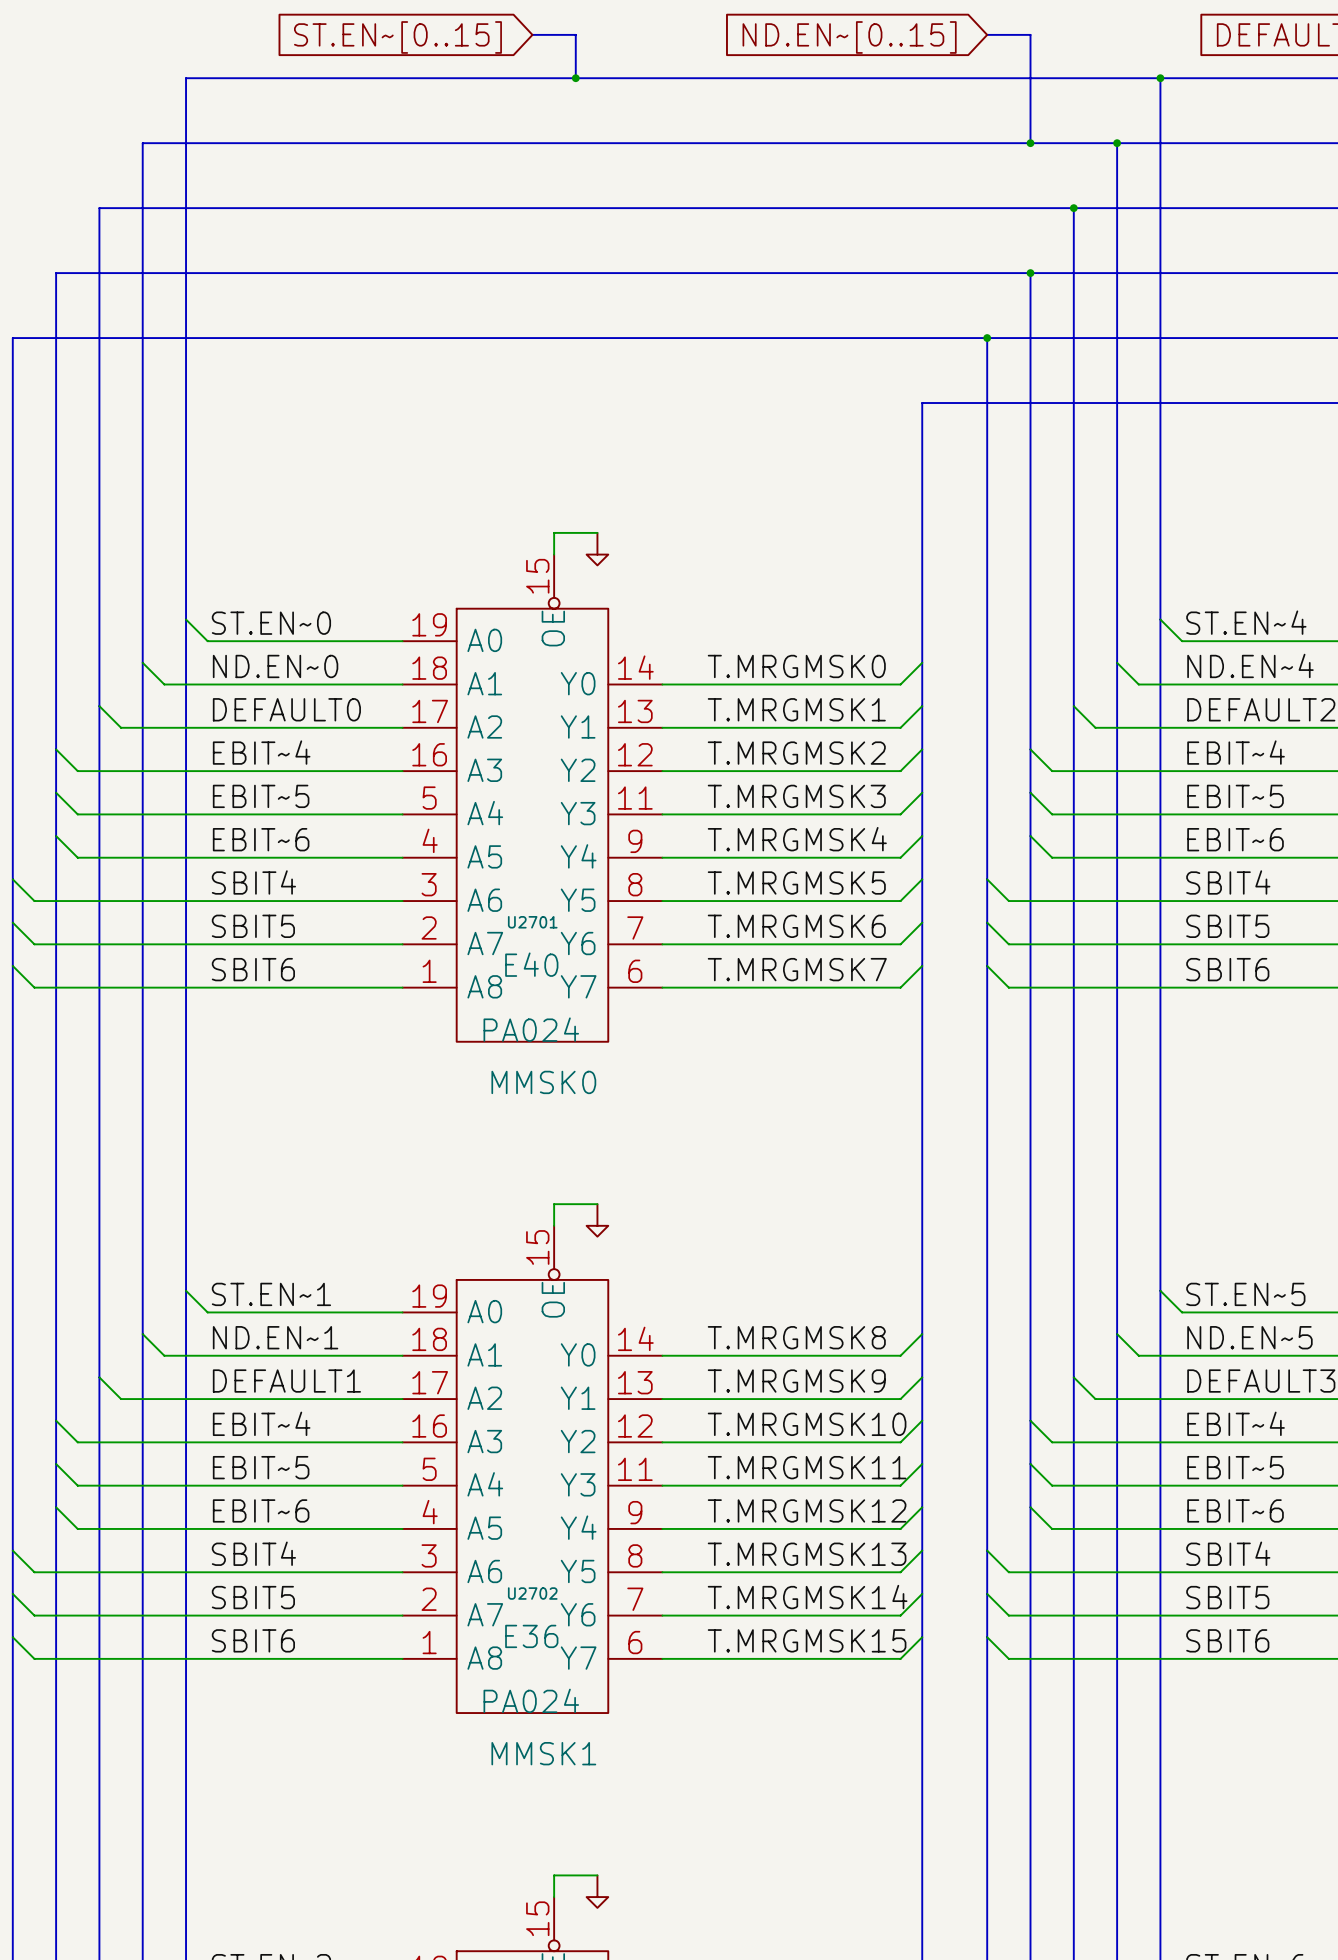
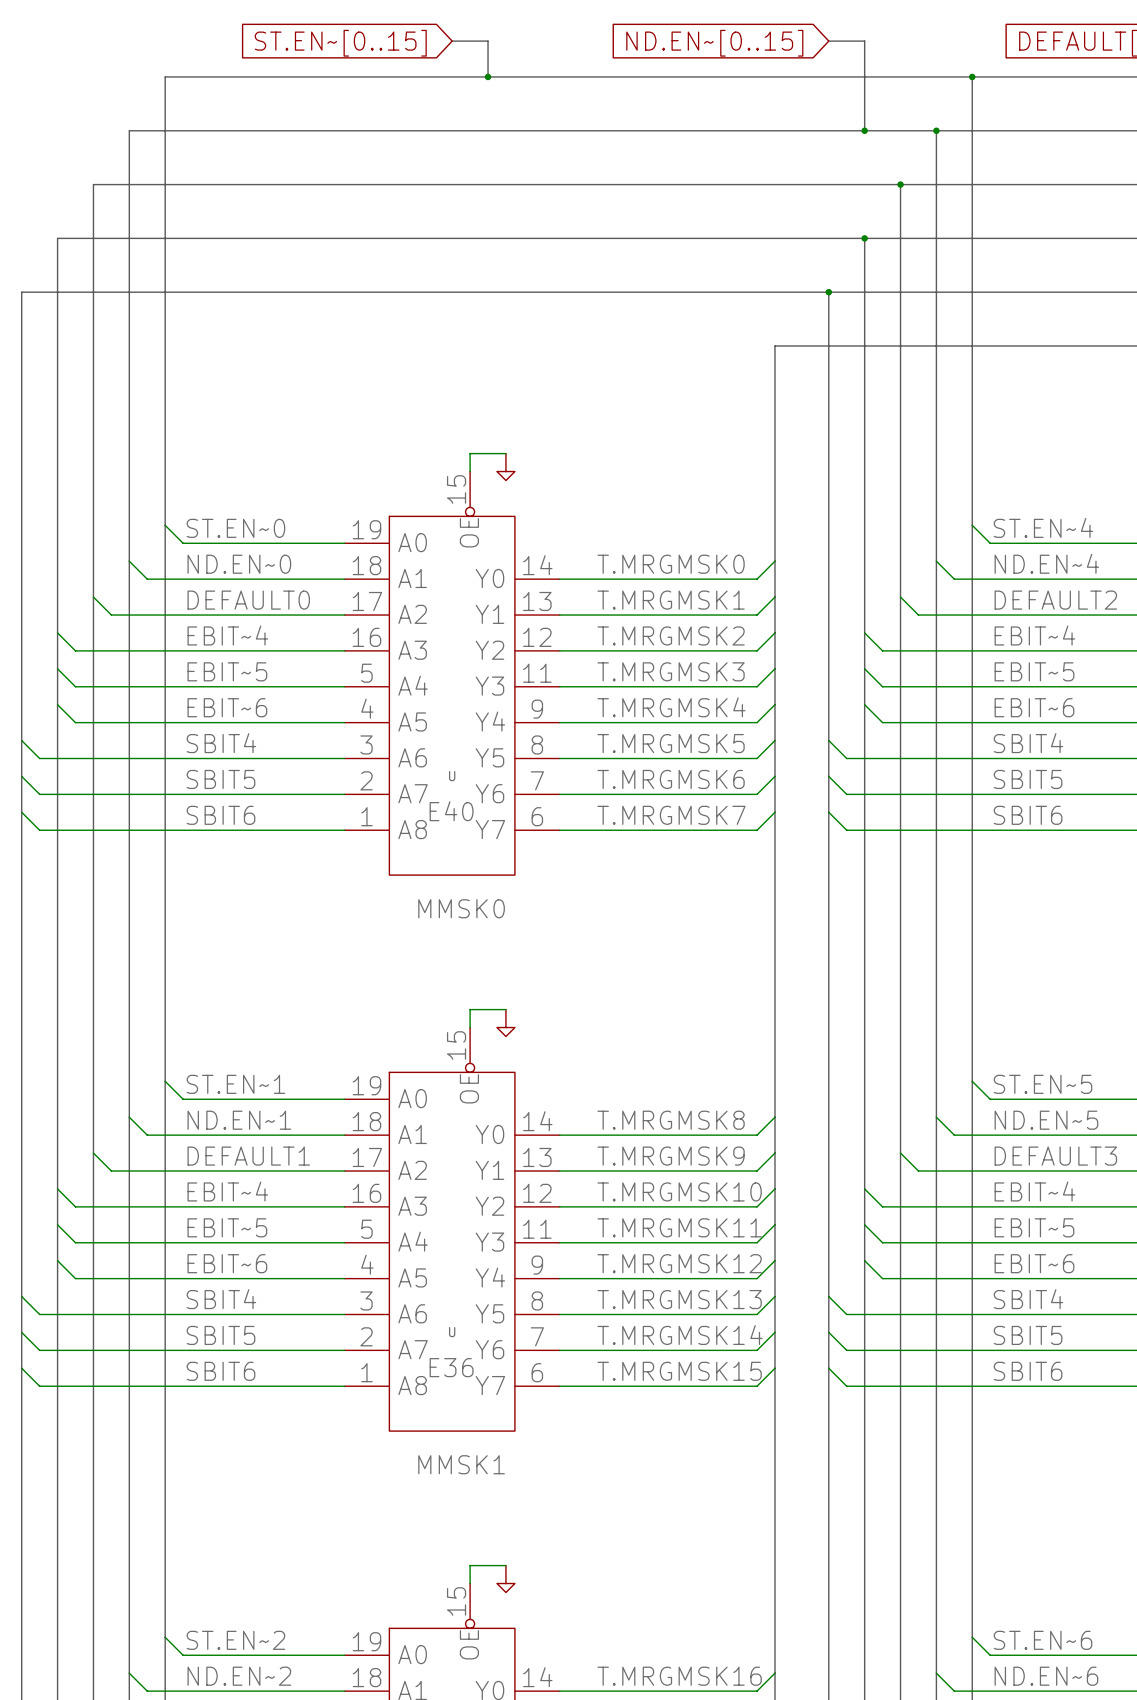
U2701 name: U2701 (532, 922) -> U (452, 776)
U2701 value: PA024 (531, 1029) -> none
U2702 name: U2702 (532, 1593) -> U (452, 1332)
U2702 value: PA024 (531, 1700) -> none

